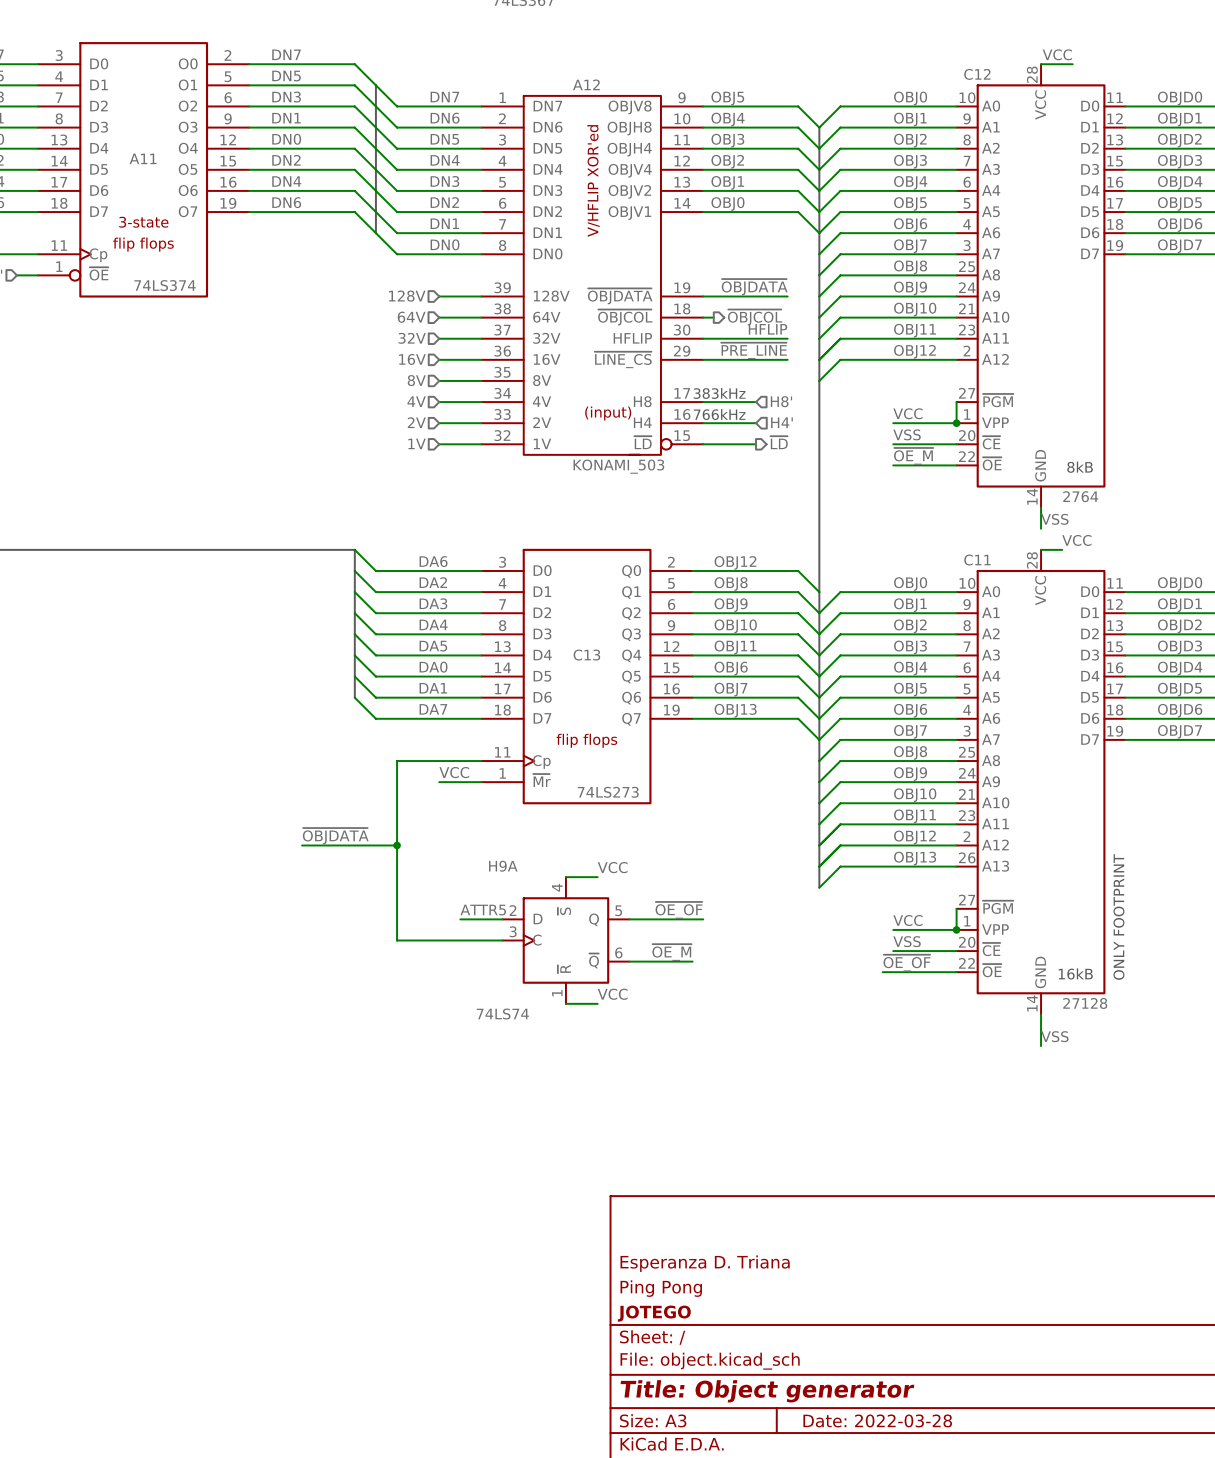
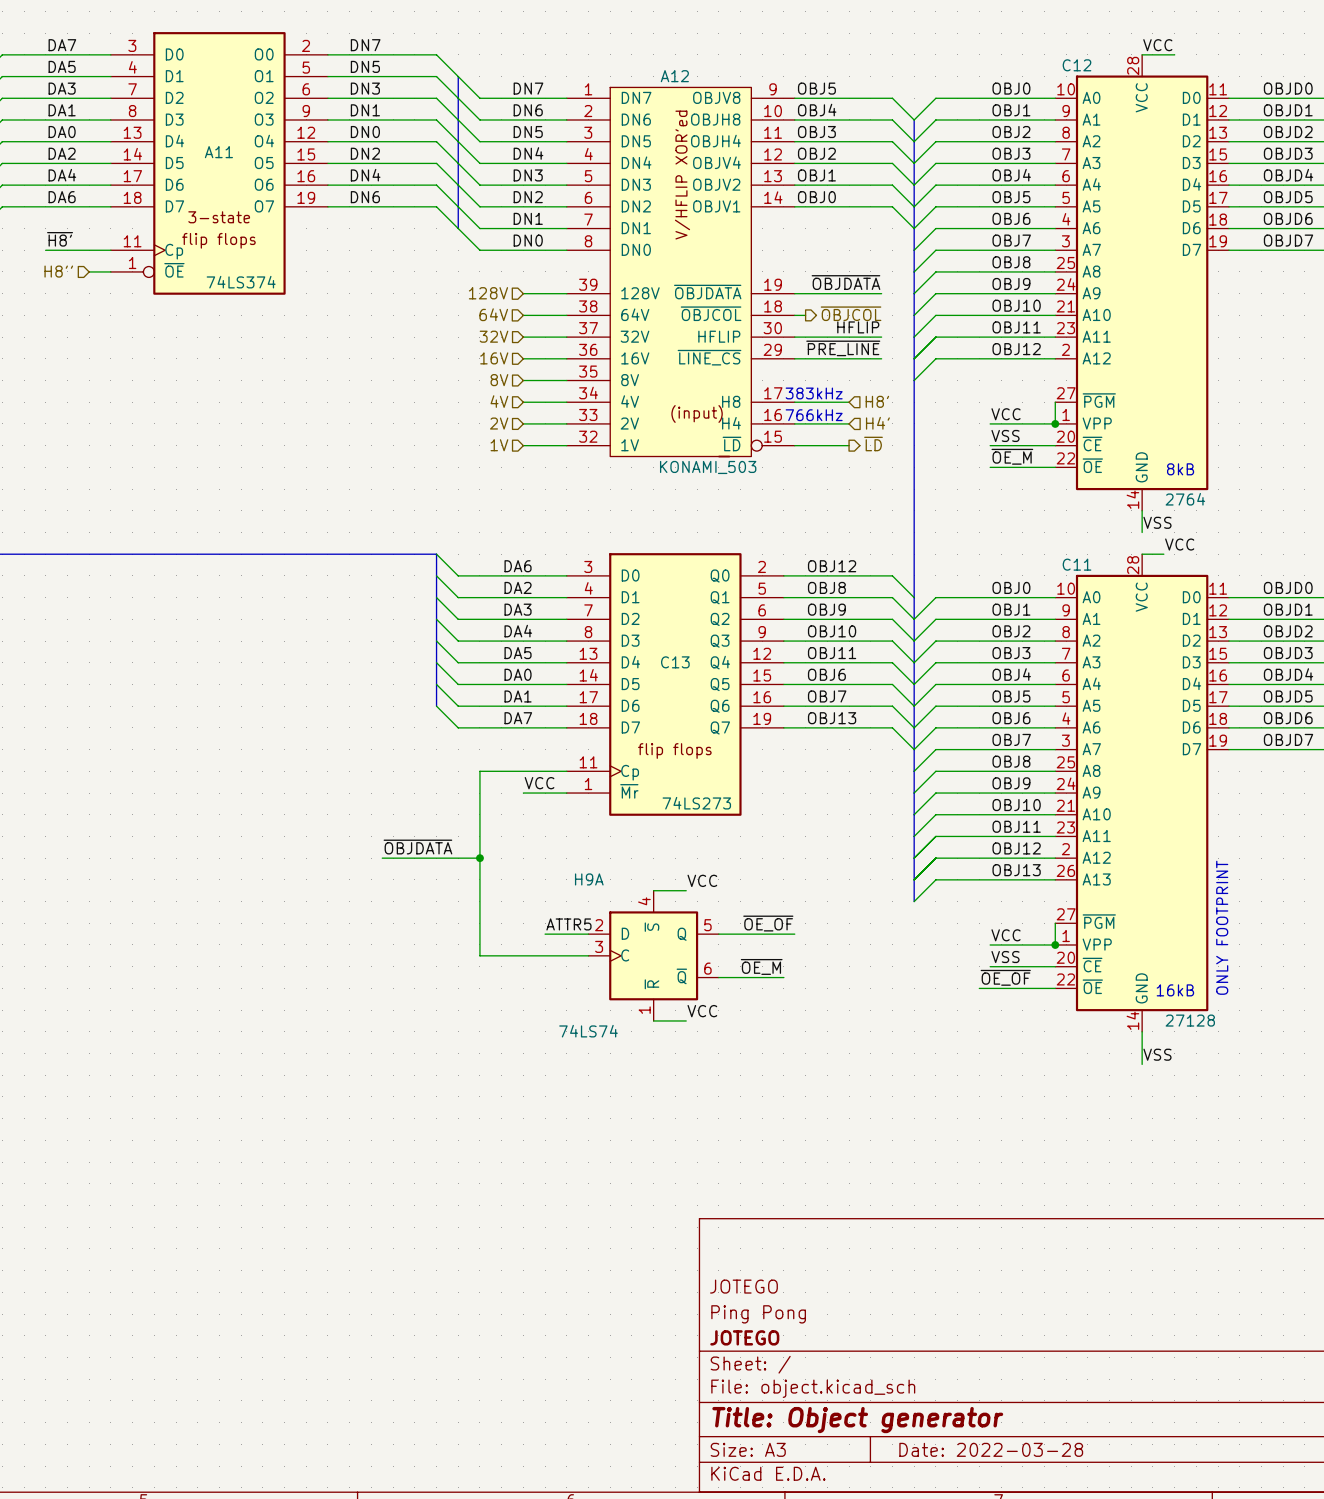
title block: Esperanza D. Triana (705, 1263) -> JOTEGO (743, 1286)

